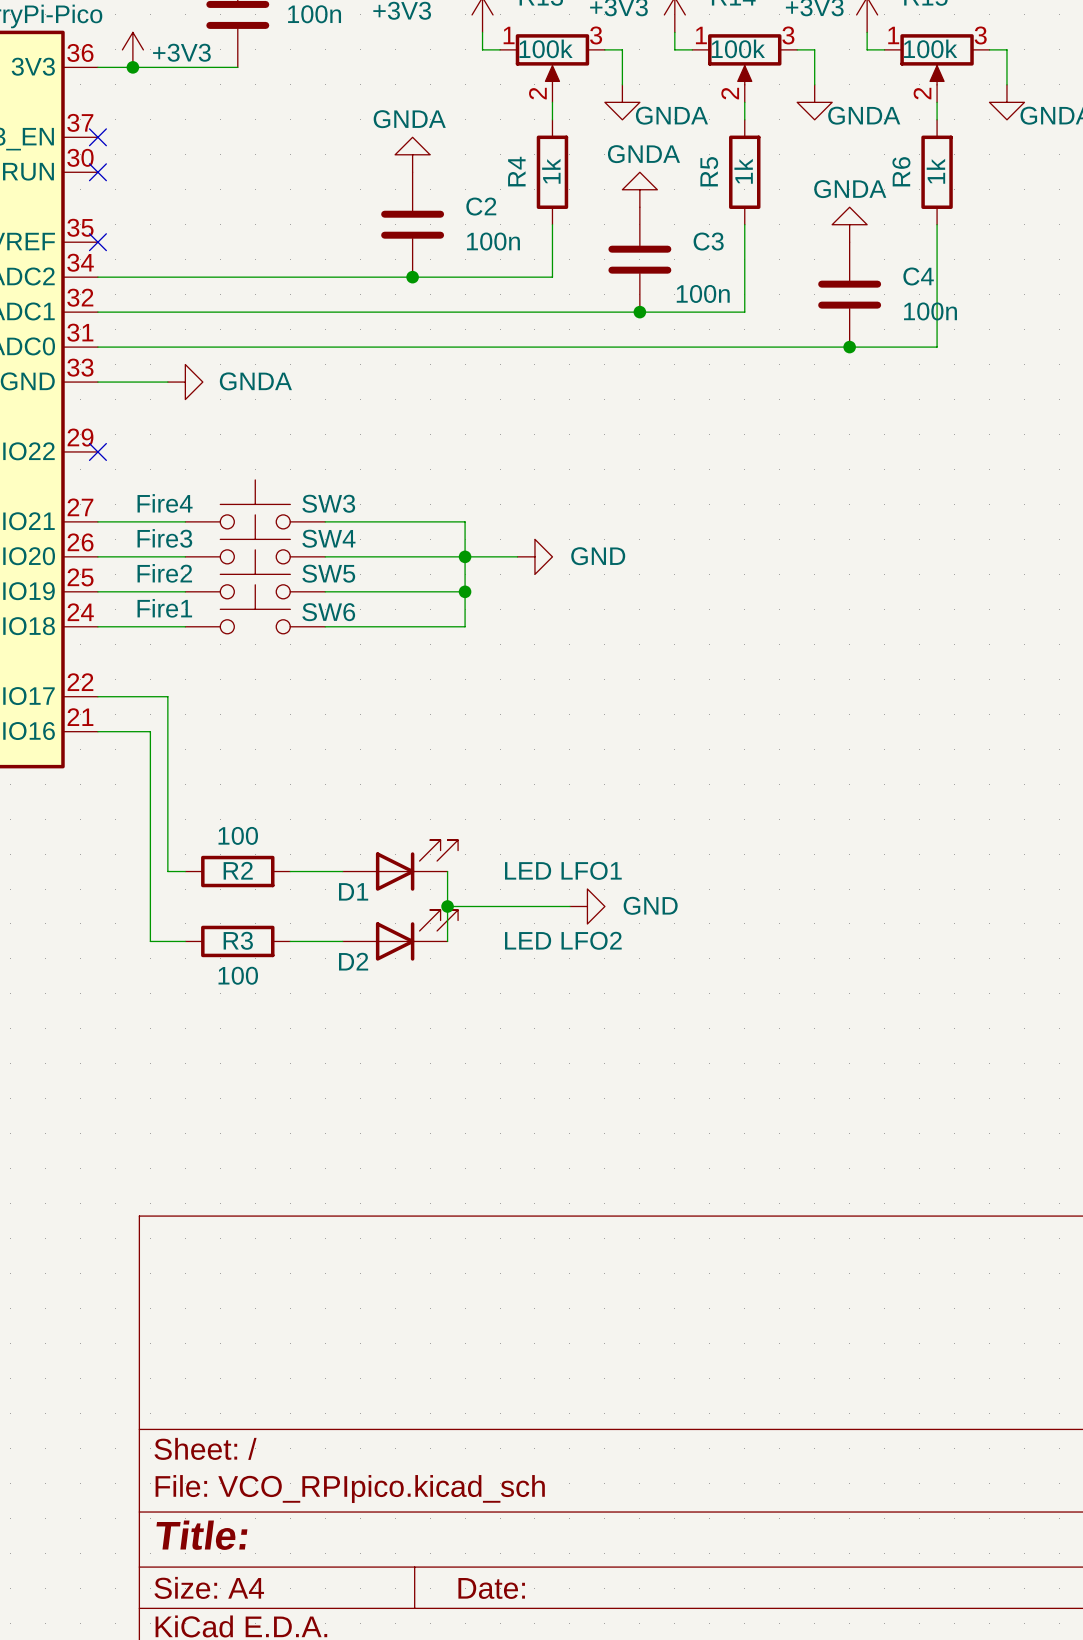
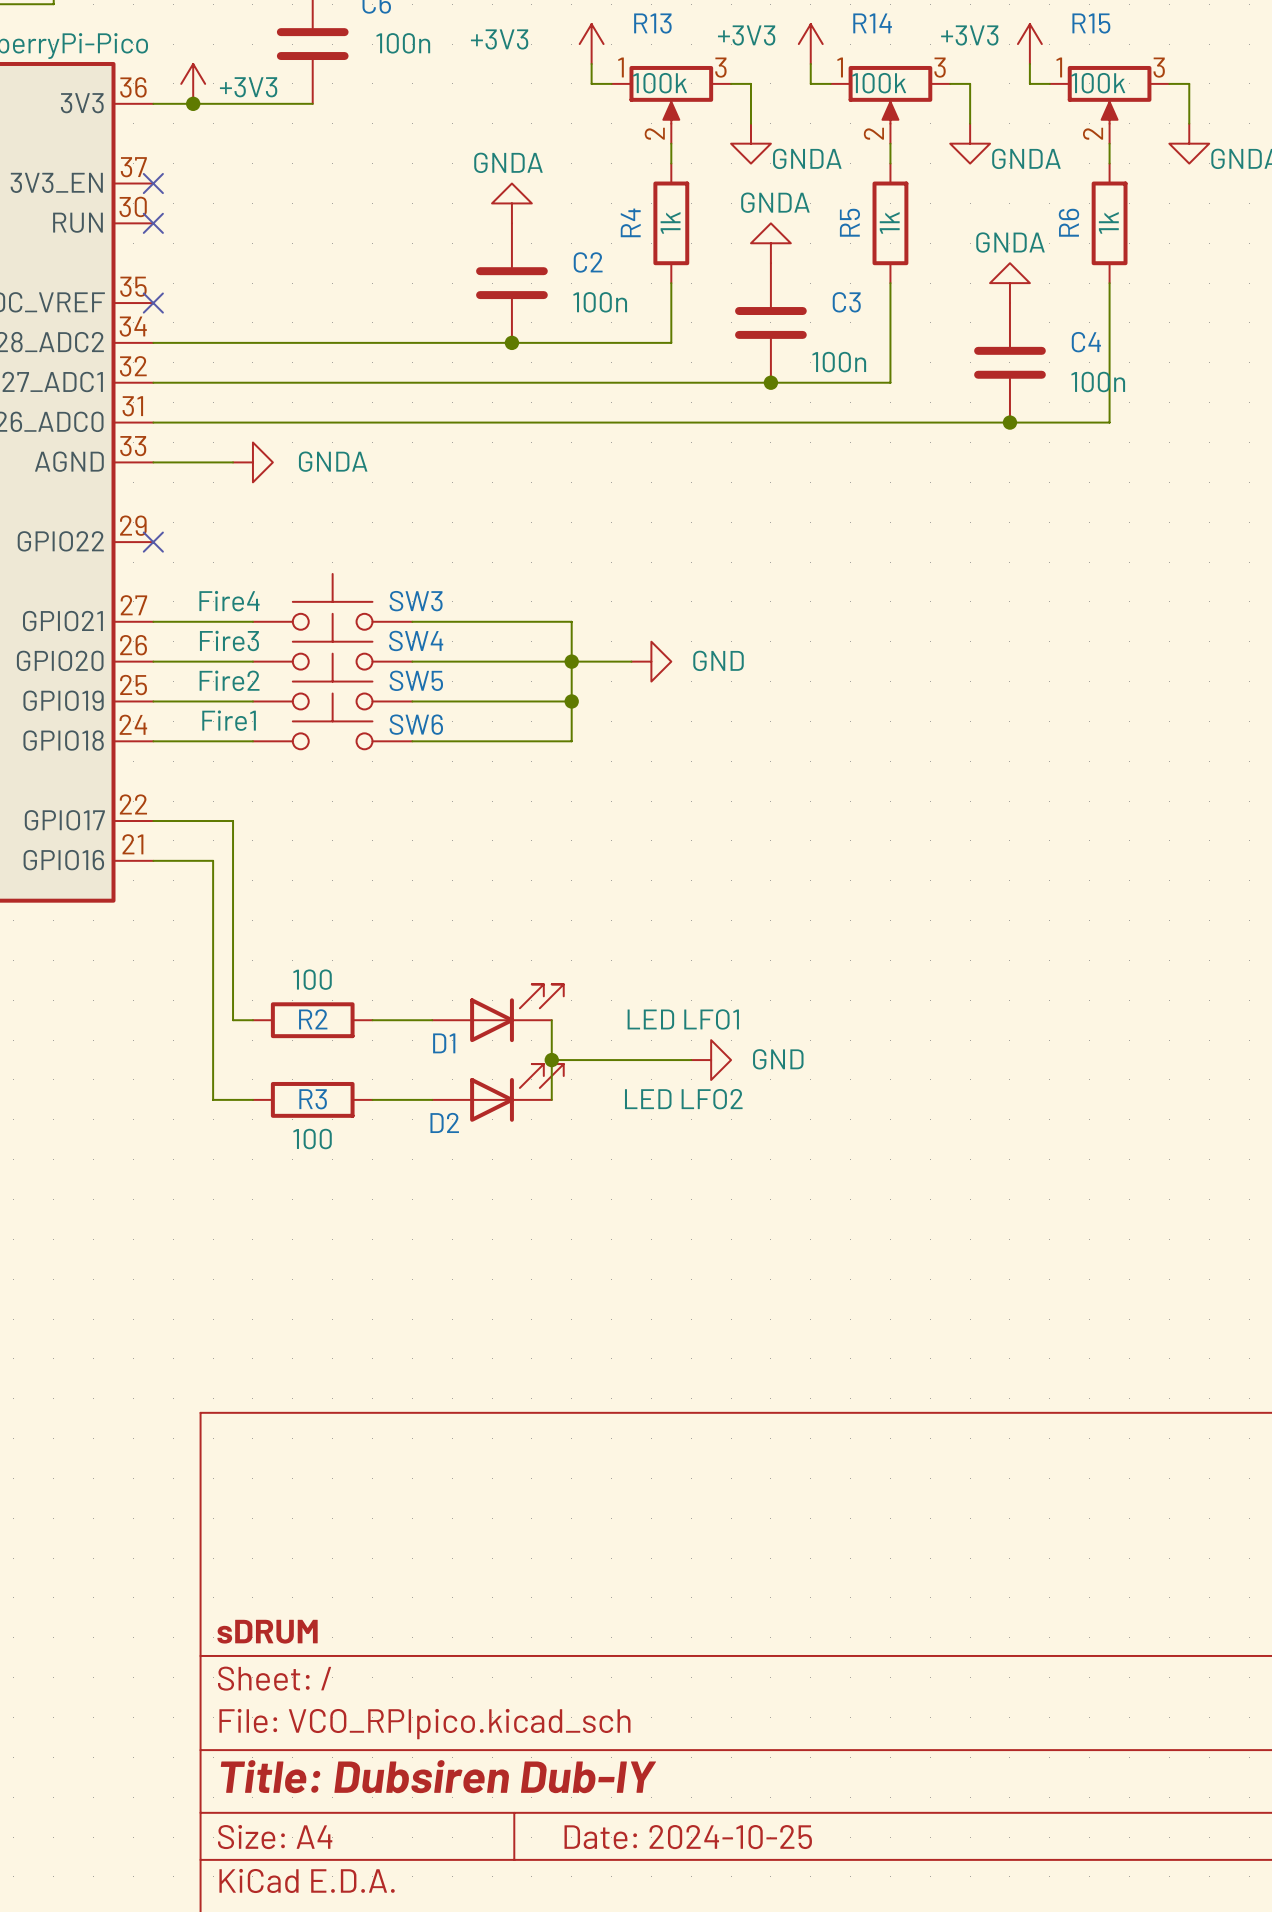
title block: none -> sDRUM (267, 1631)
title block: Title: (201, 1535) -> Title: Dubsiren Dub-IY (438, 1776)
title block: Date: (491, 1588) -> Date: 2024-10-25 (688, 1837)

